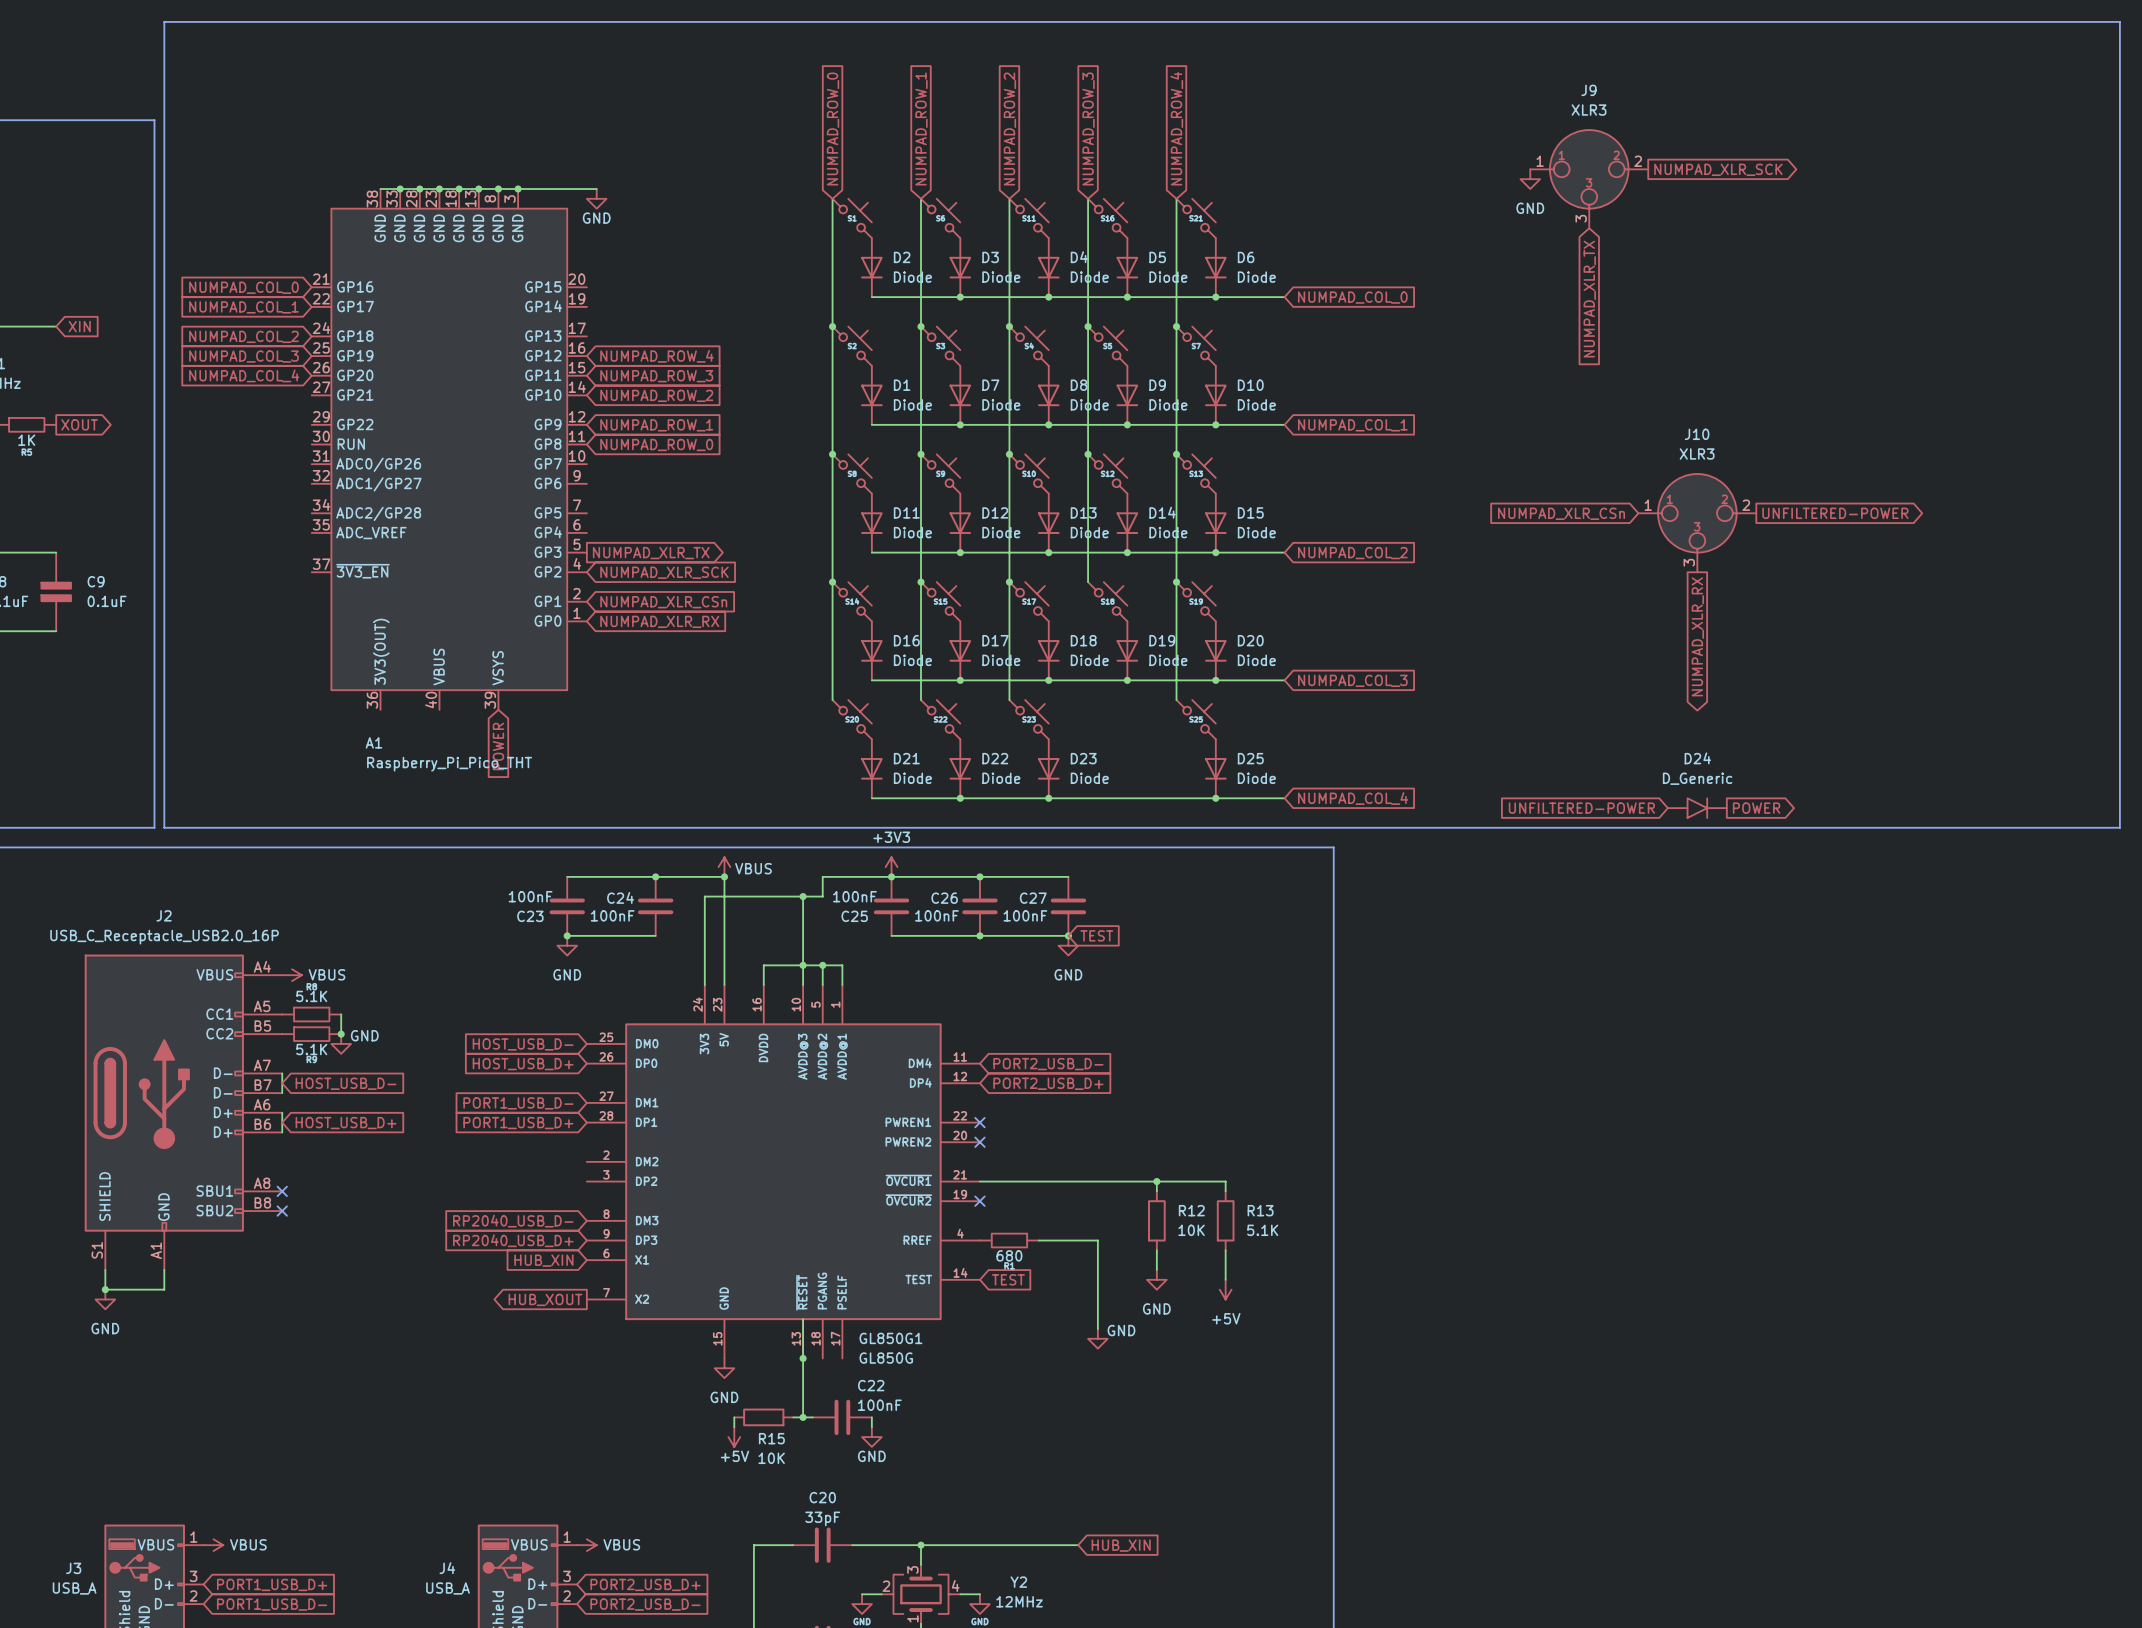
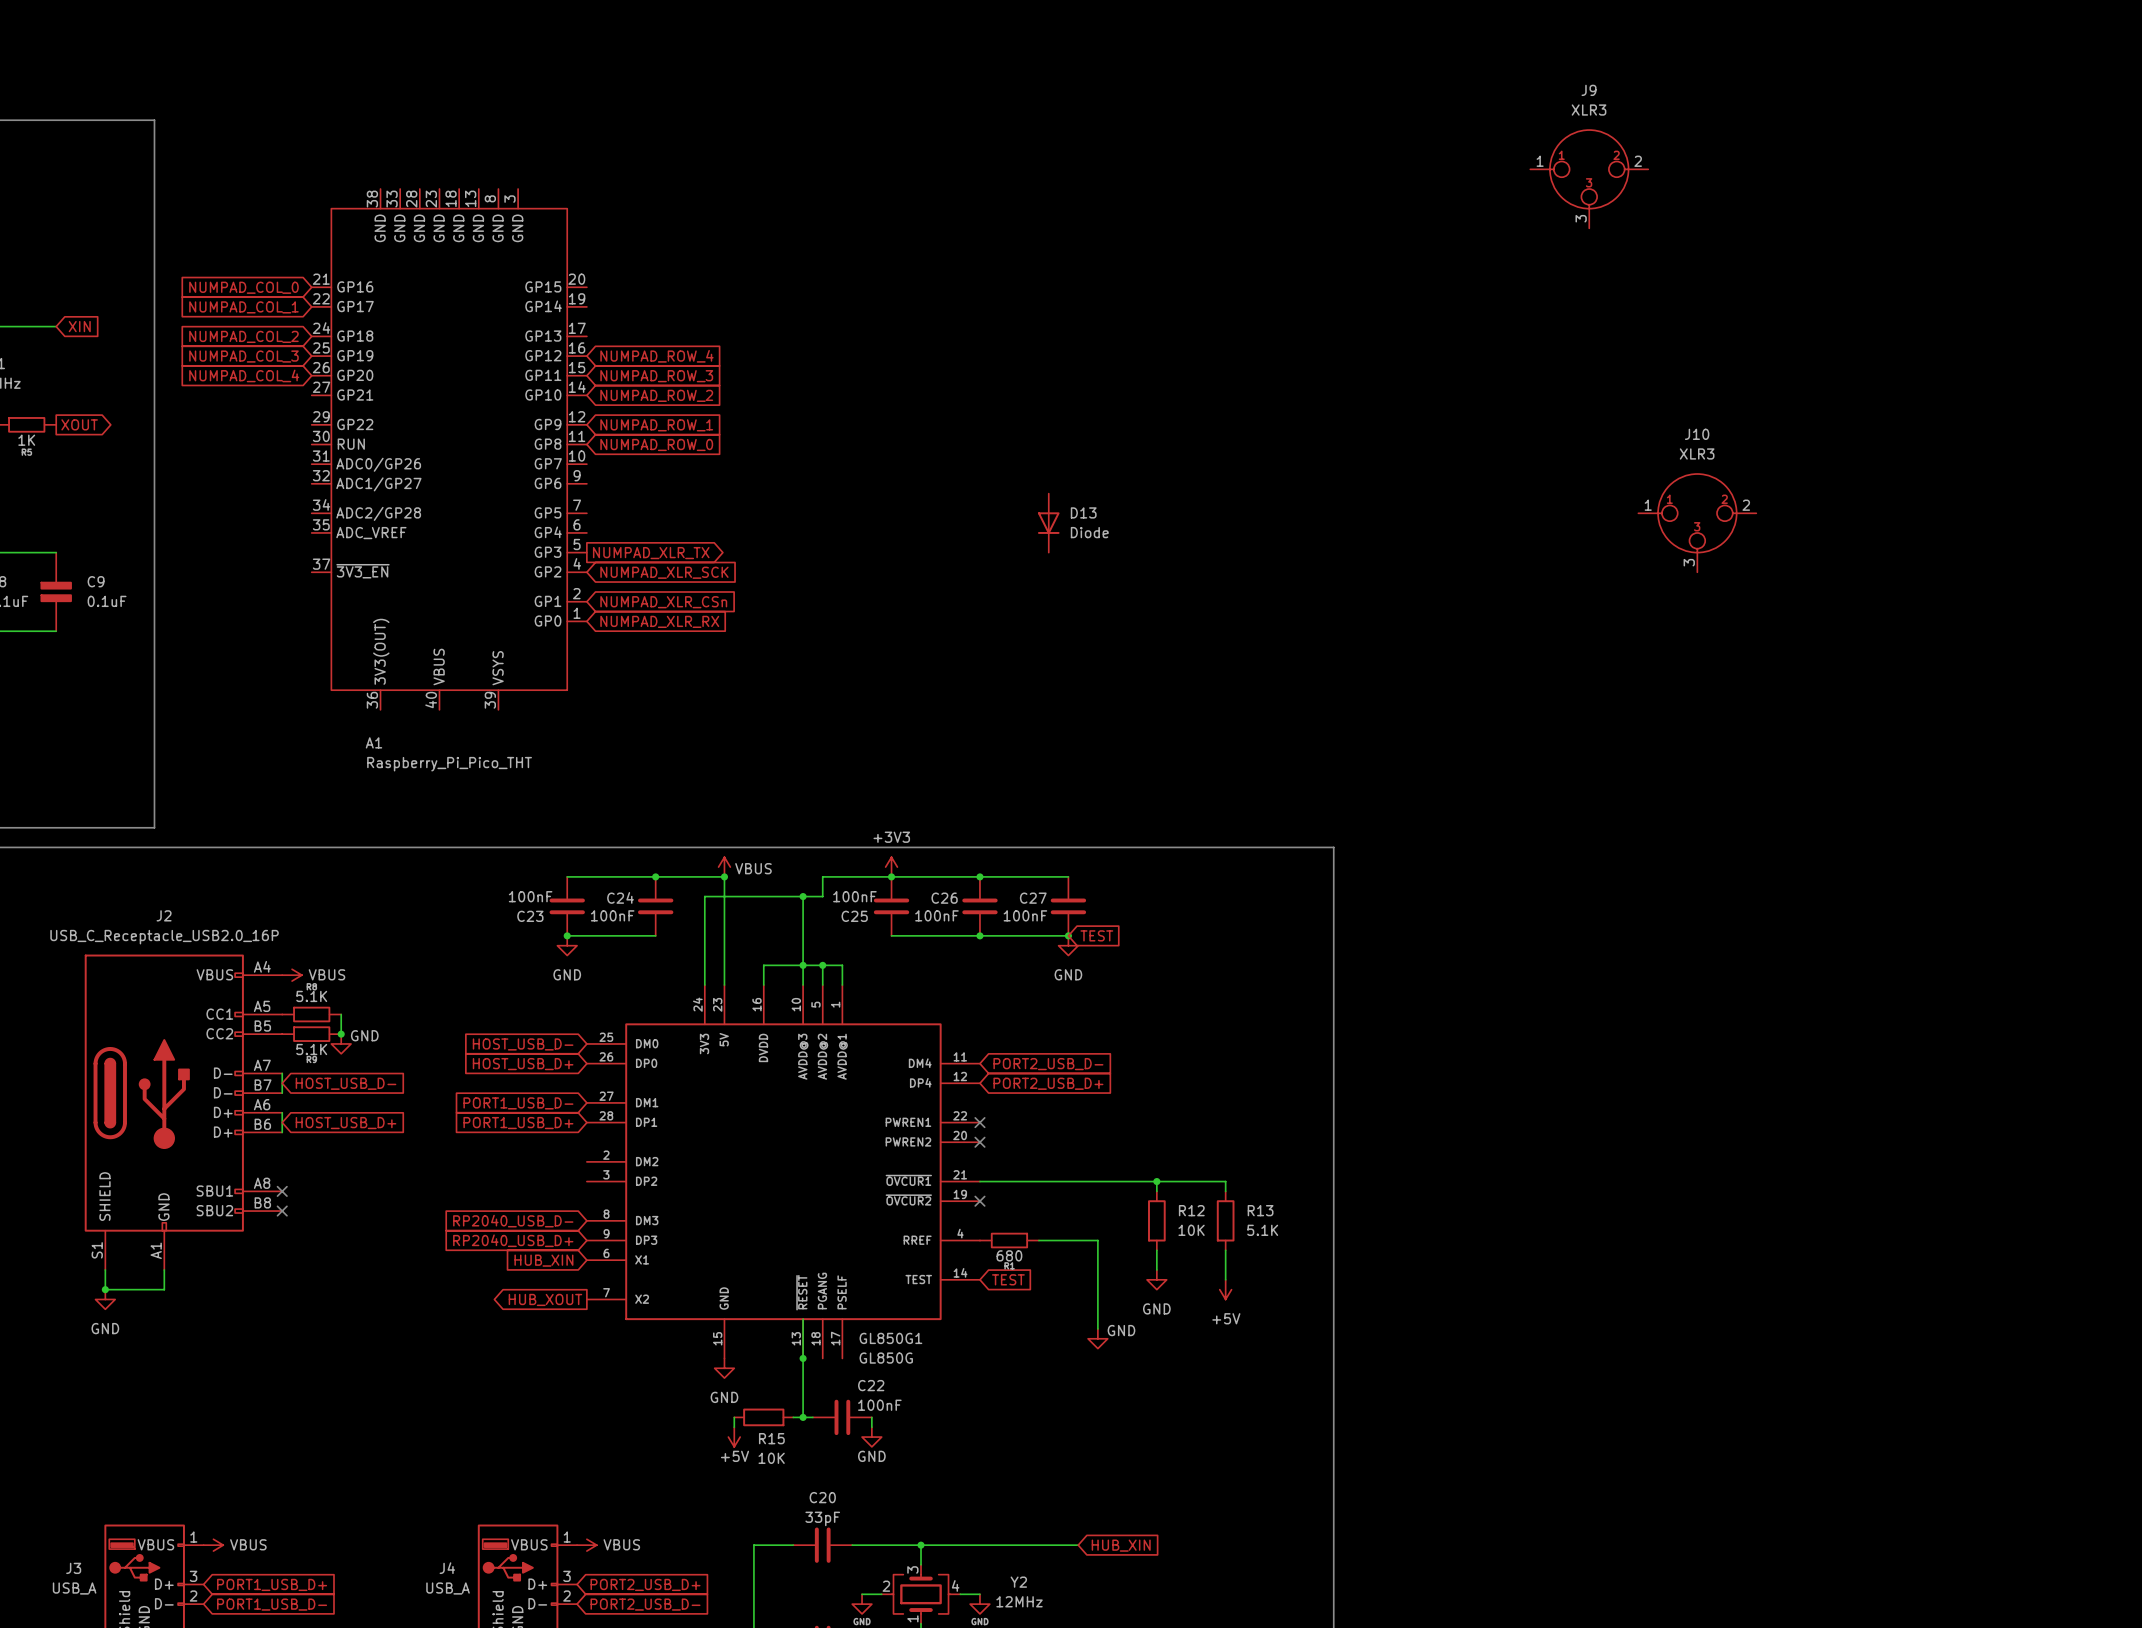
line: (164, 21) (2119, 21) (2119, 827) (164, 827) (164, 21) -> none
global label: NUMPAD_ROW_0 (833, 128) -> none
global label: NUMPAD_ROW_1 (921, 128) -> none
global label: NUMPAD_ROW_2 (1009, 128) -> none
global label: NUMPAD_ROW_3 (1088, 128) -> none
global label: NUMPAD_ROW_4 (1176, 128) -> none
global label: NUMPAD_XLR_SCK (1718, 169) -> none
power symbol: GND (1530, 179) -> none
wire: (380, 189) (596, 189) -> none
junction: (400, 189) -> none
junction: (419, 189) -> none
junction: (439, 189) -> none
junction: (459, 189) -> none
junction: (478, 189) -> none
junction: (498, 189) -> none
junction: (518, 189) -> none
power symbol: GND (596, 198) -> none
wire: (832, 198) (832, 700) -> none
wire: (921, 198) (921, 700) -> none
wire: (1009, 198) (1009, 700) -> none
wire: (1088, 198) (1088, 582) -> none
wire: (1176, 198) (1176, 700) -> none
part: (852, 218) -> none
part: (940, 218) -> none
part: (1029, 218) -> none
part: (1107, 218) -> none
part: (1196, 218) -> none
D2: Diode (871, 267) -> none
D3: Diode (960, 267) -> none
D4: Diode (1048, 267) -> none
D5: Diode (1127, 267) -> none
D6: Diode (1215, 267) -> none
wire: (871, 297) (1284, 297) -> none
junction: (960, 297) -> none
junction: (1048, 297) -> none
junction: (1127, 297) -> none
junction: (1215, 297) -> none
global label: NUMPAD_COL_0 (1352, 297) -> none
global label: NUMPAD_XLR_TX (1589, 299) -> none
junction: (832, 326) -> none
junction: (921, 326) -> none
junction: (1009, 326) -> none
junction: (1088, 326) -> none
junction: (1176, 326) -> none
part: (852, 346) -> none
part: (940, 346) -> none
part: (1029, 346) -> none
part: (1107, 346) -> none
part: (1196, 346) -> none
D1: Diode (871, 395) -> none
D7: Diode (960, 395) -> none
D8: Diode (1048, 395) -> none
D9: Diode (1127, 395) -> none
D10: Diode (1215, 395) -> none
wire: (871, 424) (1284, 424) -> none
junction: (960, 424) -> none
junction: (1048, 424) -> none
junction: (1127, 424) -> none
junction: (1215, 424) -> none
global label: NUMPAD_COL_1 (1352, 425) -> none
junction: (832, 454) -> none
junction: (921, 454) -> none
junction: (1009, 454) -> none
junction: (1088, 454) -> none
junction: (1176, 454) -> none
part: (852, 473) -> none
part: (940, 473) -> none
part: (1029, 473) -> none
part: (1107, 473) -> none
part: (1196, 473) -> none
global label: NUMPAD_XLR_CSn (1561, 513) -> none
global label: UNFILTERED-POWER (1835, 513) -> none
D11: Diode (871, 523) -> none
D12: Diode (960, 523) -> none
D14: Diode (1127, 523) -> none
D15: Diode (1215, 523) -> none
wire: (871, 552) (1284, 552) -> none
junction: (960, 552) -> none
junction: (1048, 552) -> none
junction: (1127, 552) -> none
junction: (1215, 552) -> none
global label: NUMPAD_COL_2 (1352, 553) -> none
junction: (832, 582) -> none
junction: (921, 582) -> none
junction: (1009, 582) -> none
junction: (1176, 582) -> none
part: (852, 601) -> none
part: (940, 601) -> none
part: (1029, 601) -> none
part: (1107, 601) -> none
part: (1196, 601) -> none
global label: NUMPAD_XLR_RX (1697, 636) -> none
D16: Diode (871, 650) -> none
D17: Diode (960, 650) -> none
D18: Diode (1048, 650) -> none
D19: Diode (1127, 650) -> none
D20: Diode (1215, 650) -> none
wire: (871, 680) (1284, 680) -> none
junction: (960, 680) -> none
junction: (1048, 680) -> none
junction: (1127, 680) -> none
junction: (1215, 680) -> none
global label: NUMPAD_COL_3 (1352, 680) -> none
part: (852, 719) -> none
part: (940, 719) -> none
part: (1029, 719) -> none
part: (1196, 719) -> none
global label: POWER (498, 746) -> none
D21: Diode (871, 768) -> none
D22: Diode (960, 768) -> none
D23: Diode (1048, 768) -> none
D25: Diode (1215, 768) -> none
wire: (871, 798) (1284, 798) -> none
junction: (960, 798) -> none
junction: (1048, 798) -> none
junction: (1215, 798) -> none
global label: NUMPAD_COL_4 (1353, 798) -> none
global label: UNFILTERED-POWER (1581, 808) -> none
D24: D_Generic (1697, 808) -> none
global label: POWER (1756, 808) -> none

